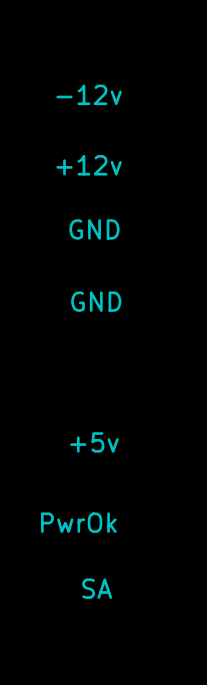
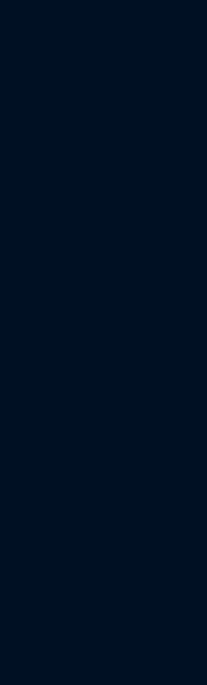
text: -12v (89, 94) -> none
text: +12v (89, 165) -> none
text: GND (94, 229) -> none
text: GND (96, 301) -> none
text: +5v (94, 442) -> none
text: PwrOk (78, 522) -> none
text: SA (97, 588) -> none

